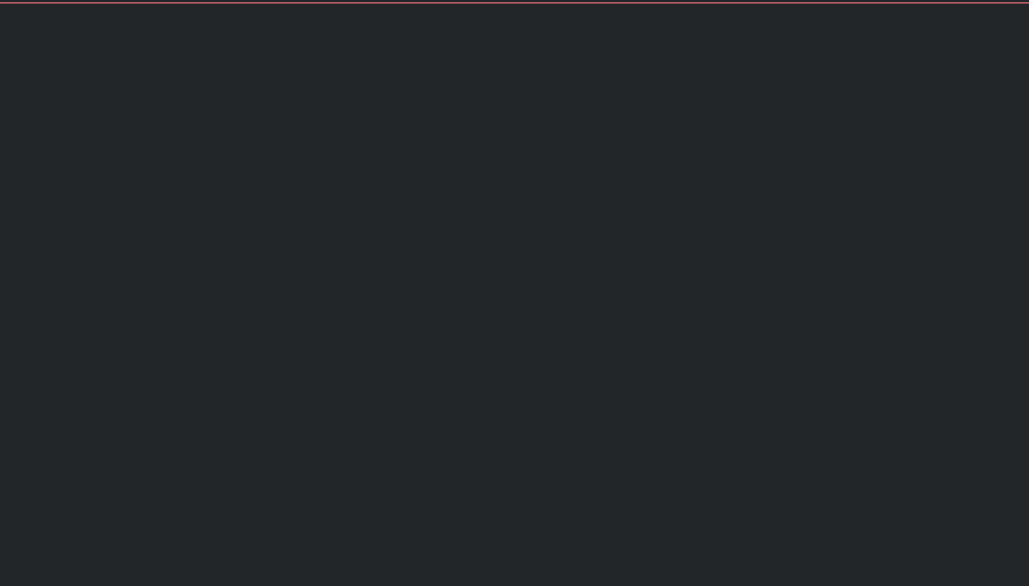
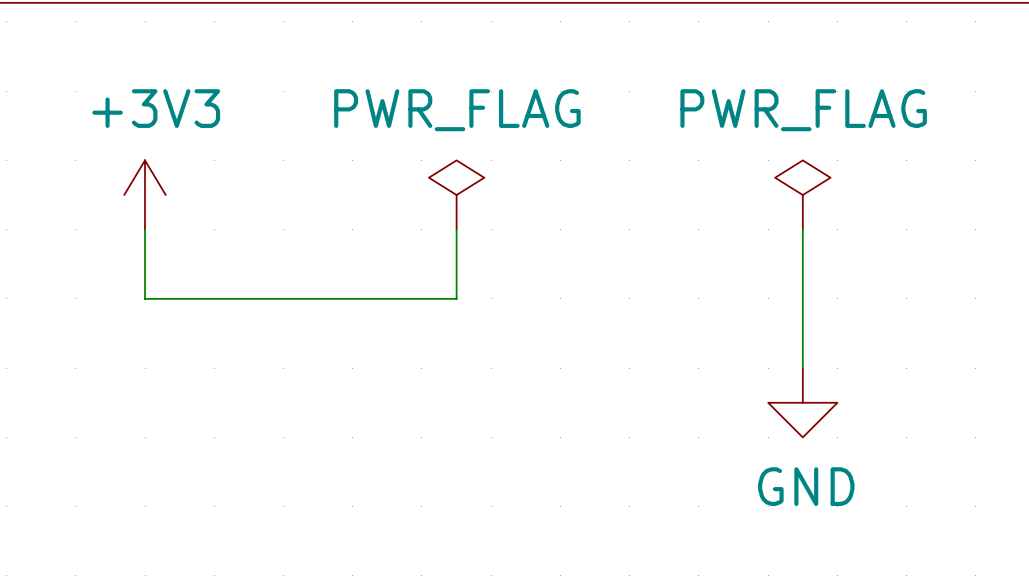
power symbol: none -> +3V3 (145, 195)
power symbol: none -> PWR_FLAG (456, 195)
power symbol: none -> PWR_FLAG (802, 195)
wire: none -> (145, 229) (145, 298) (456, 298) (456, 229)
wire: none -> (802, 229) (802, 368)
power symbol: none -> GND (802, 402)

